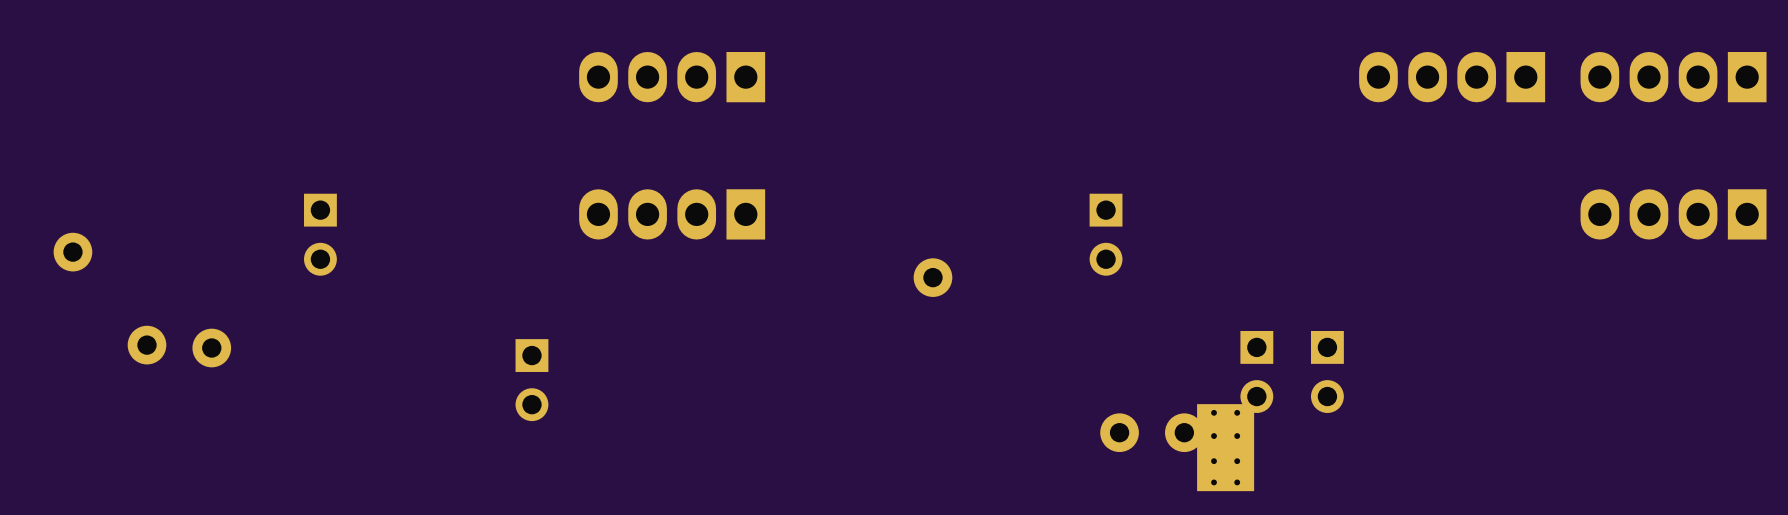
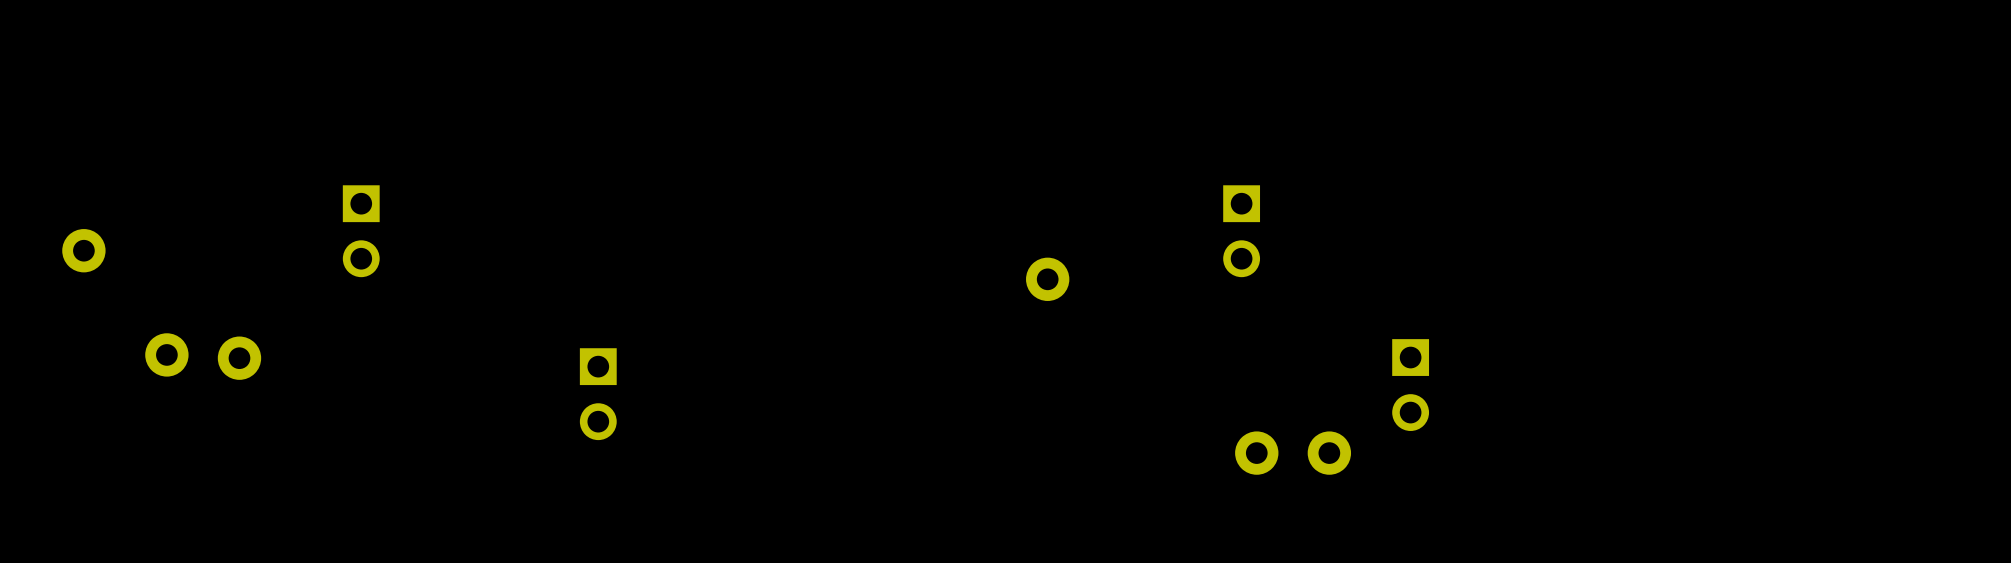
part: (672, 77) -> none
part: (1452, 77) -> none
part: (1673, 77) -> none
part: (672, 214) -> none
part: (1673, 214) -> none
part: (1327, 371) -> none
part: (1225, 447) -> none

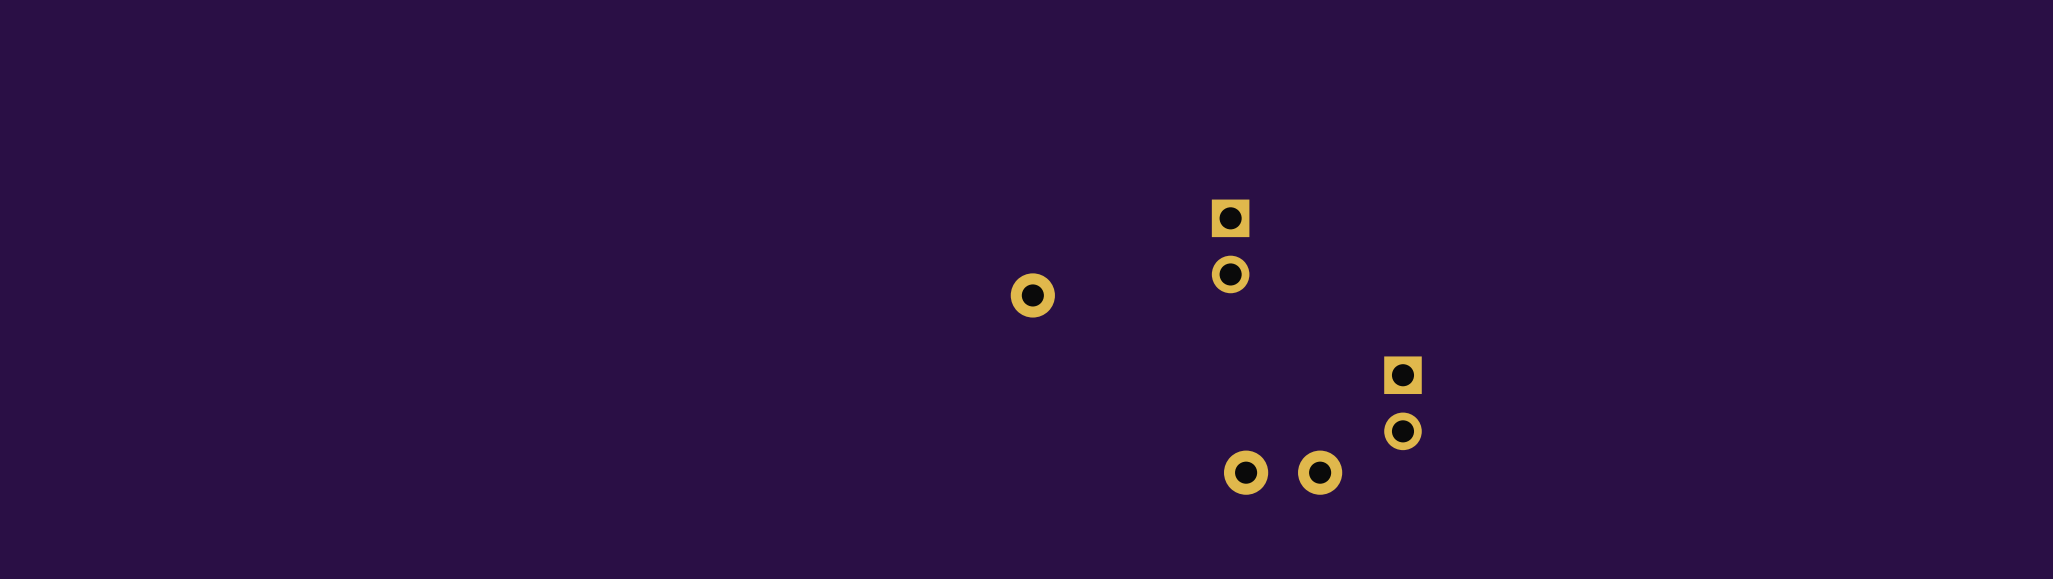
part: (361, 231) -> none
part: (83, 250) -> none
part: (166, 354) -> none
part: (239, 358) -> none
part: (598, 394) -> none

